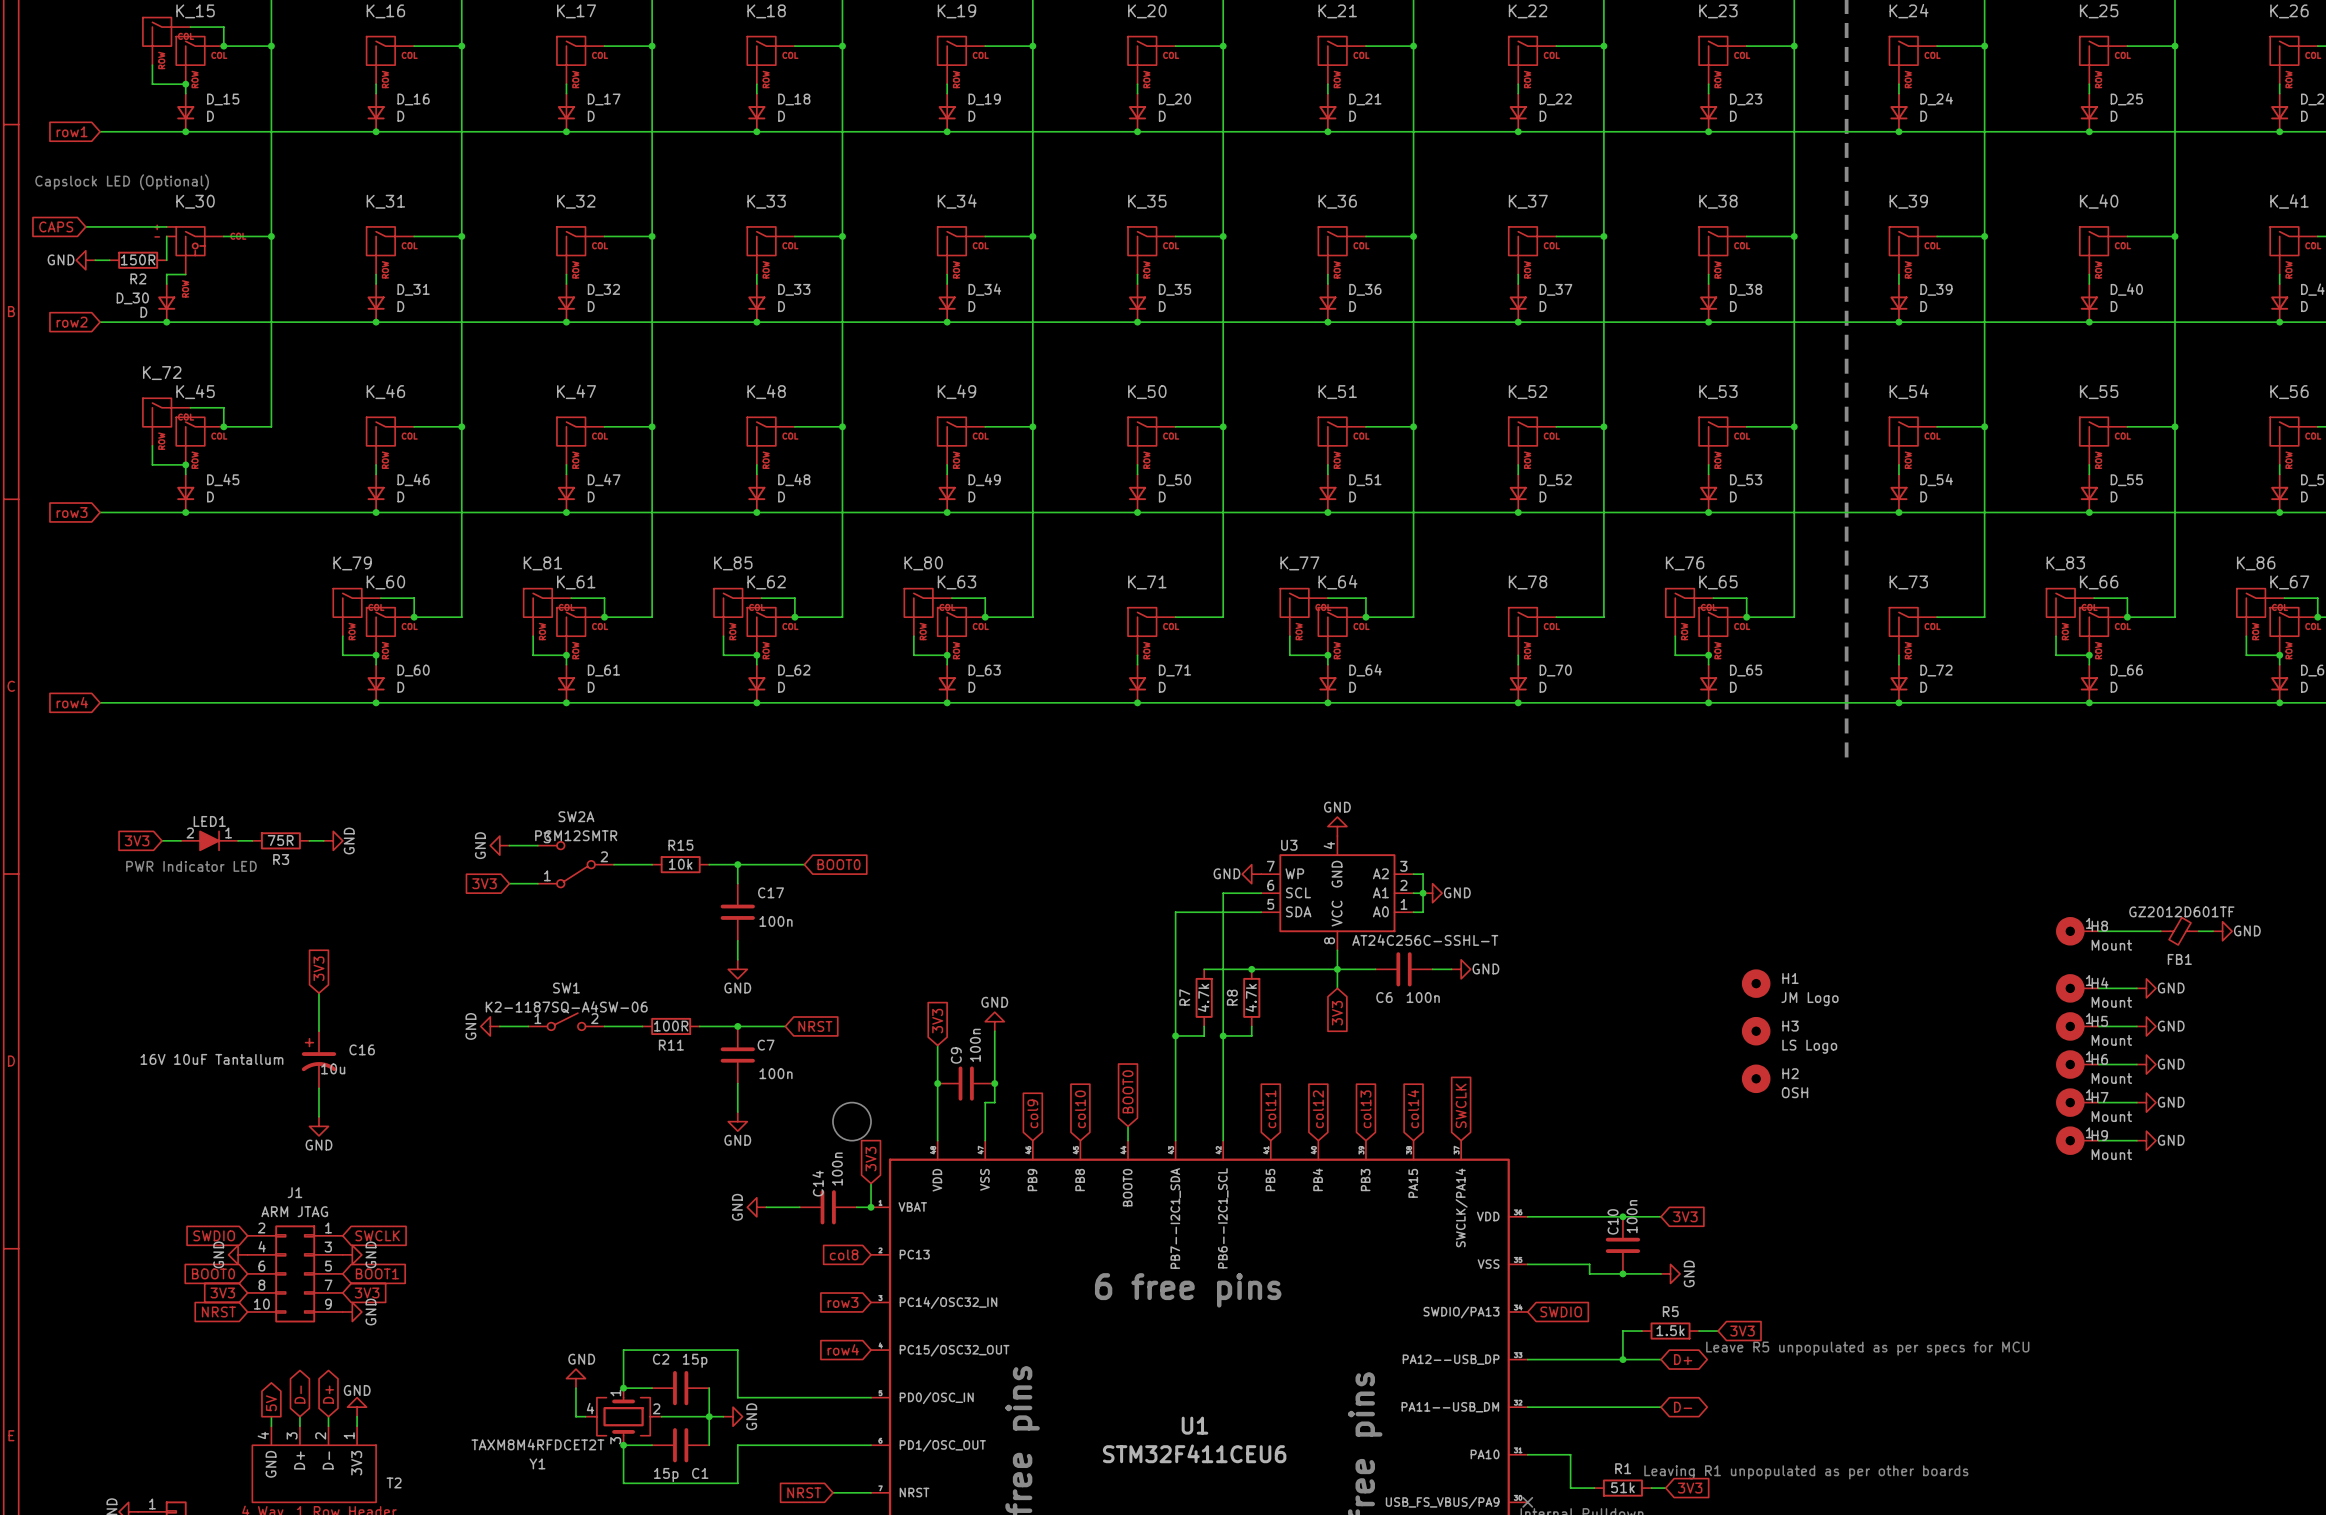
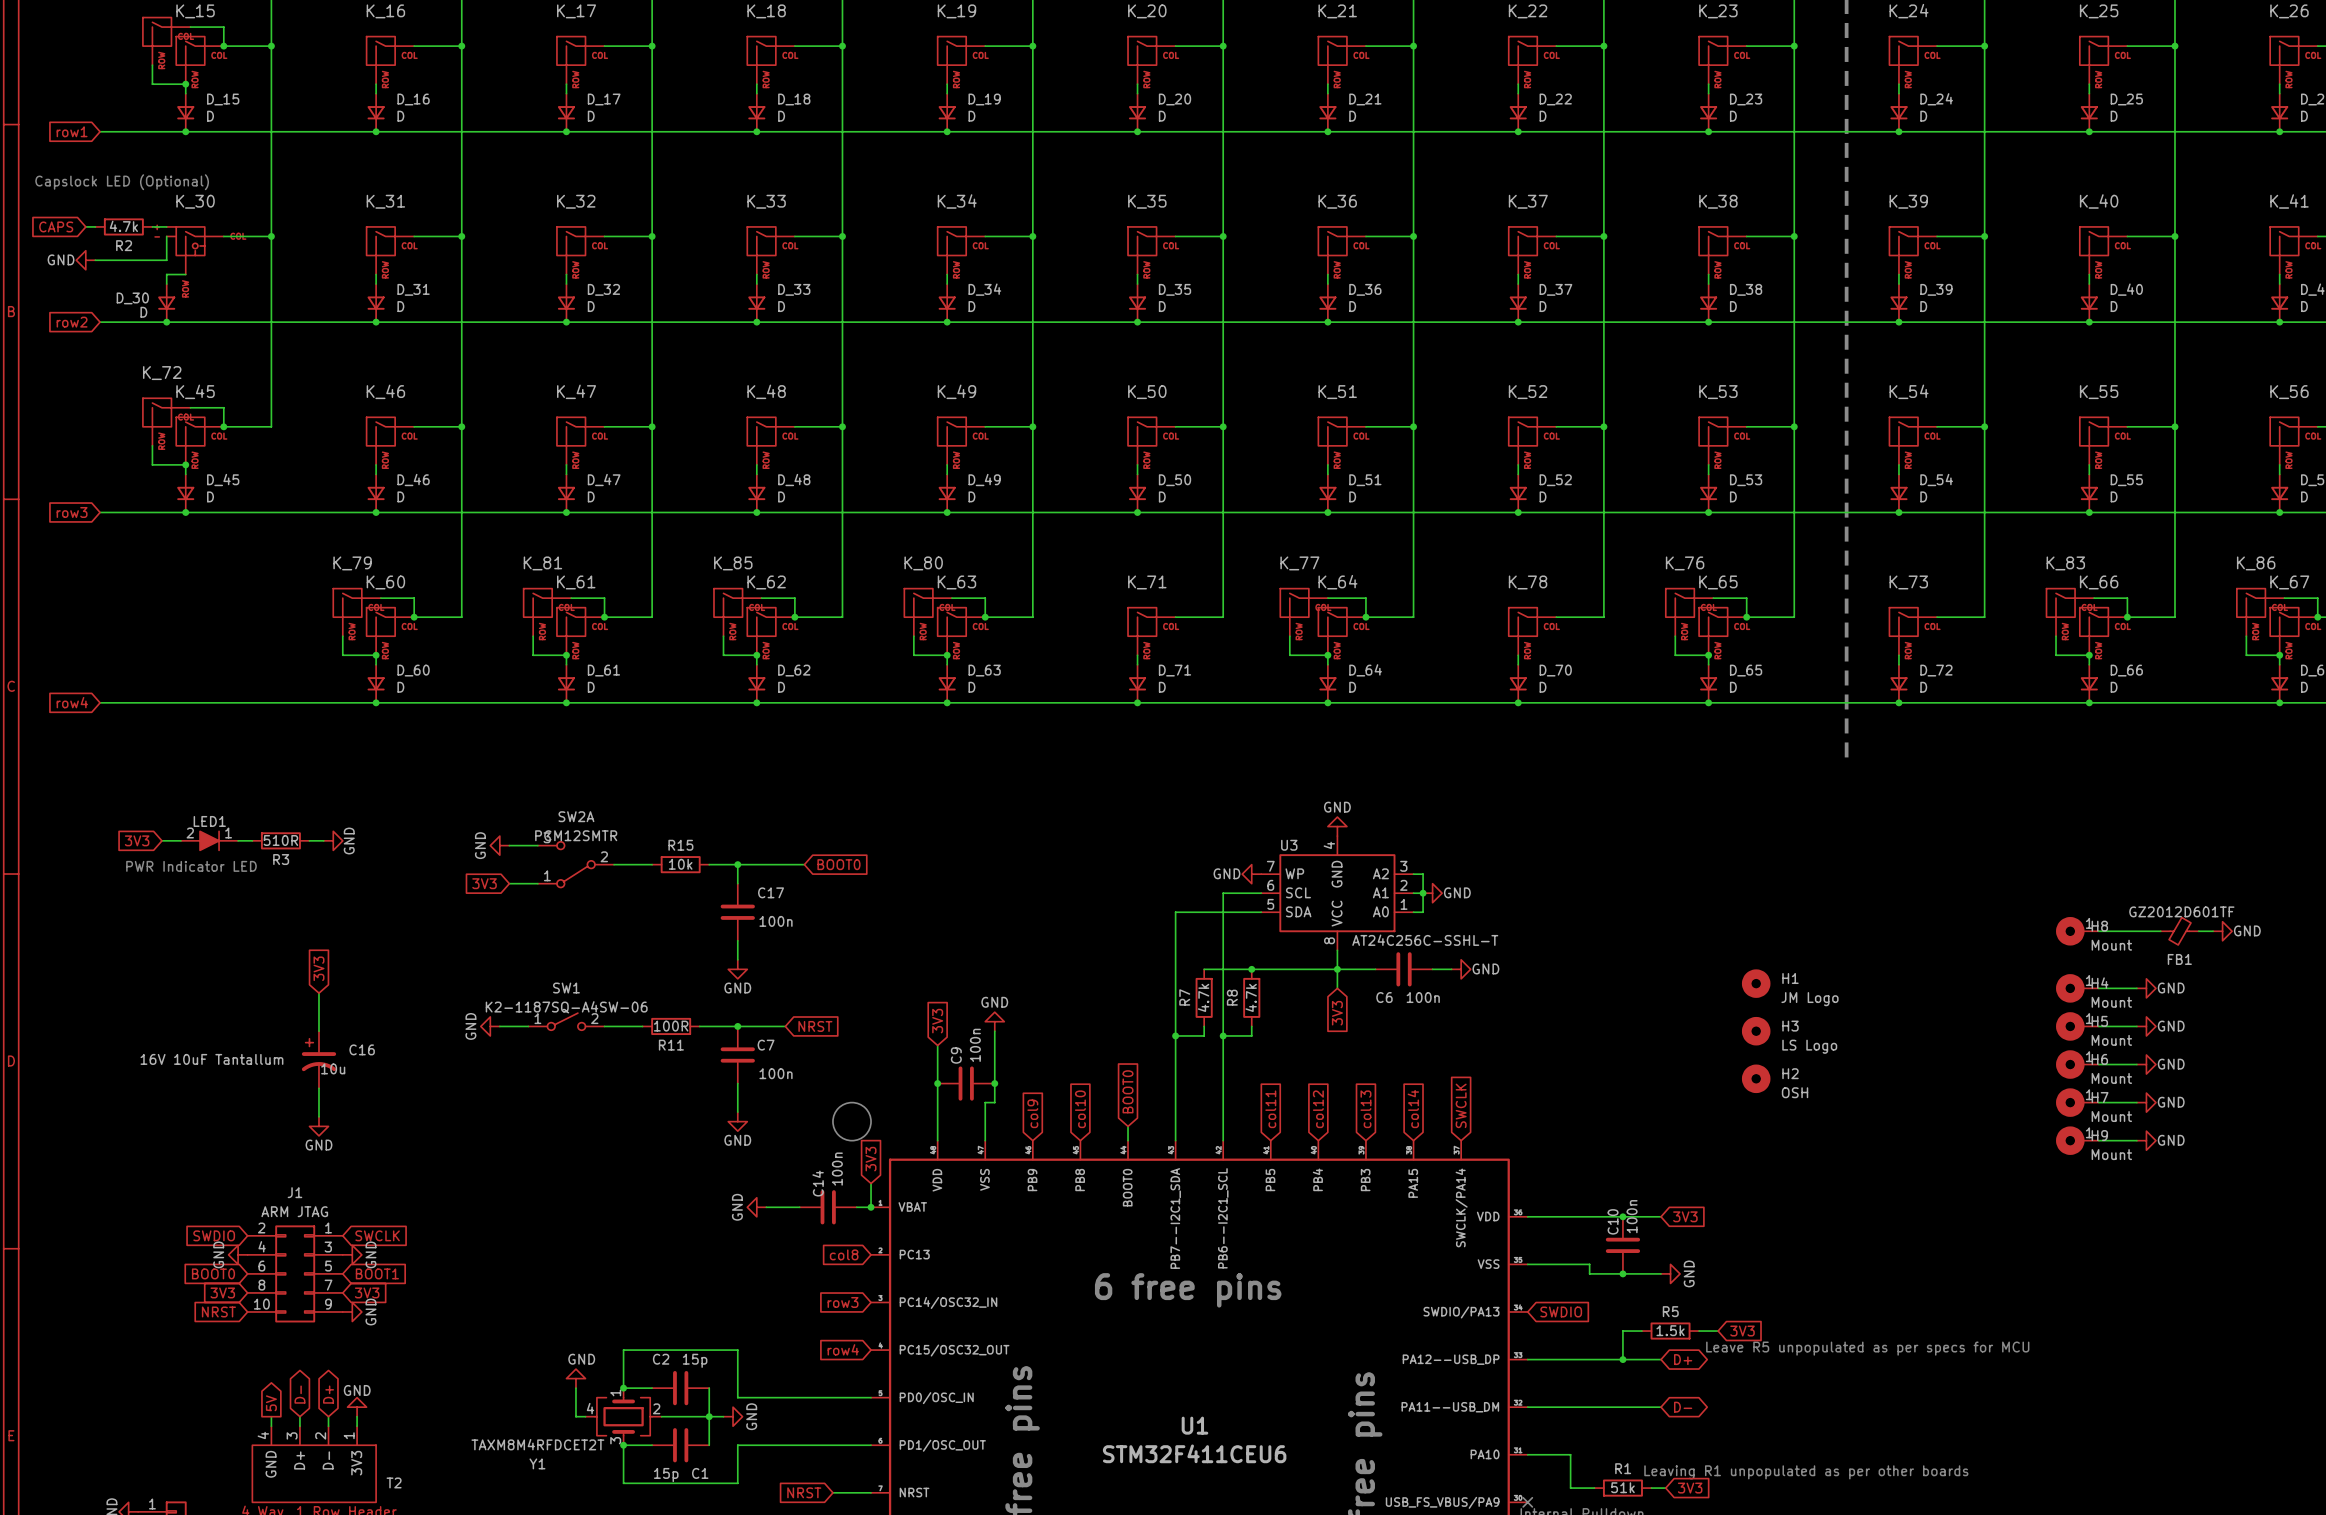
R2 value: 150R (138, 259) -> 4.7k (123, 226)
R2 position: (138, 260) -> (123, 226)
R3 value: 75R (280, 840) -> 510R (280, 840)

